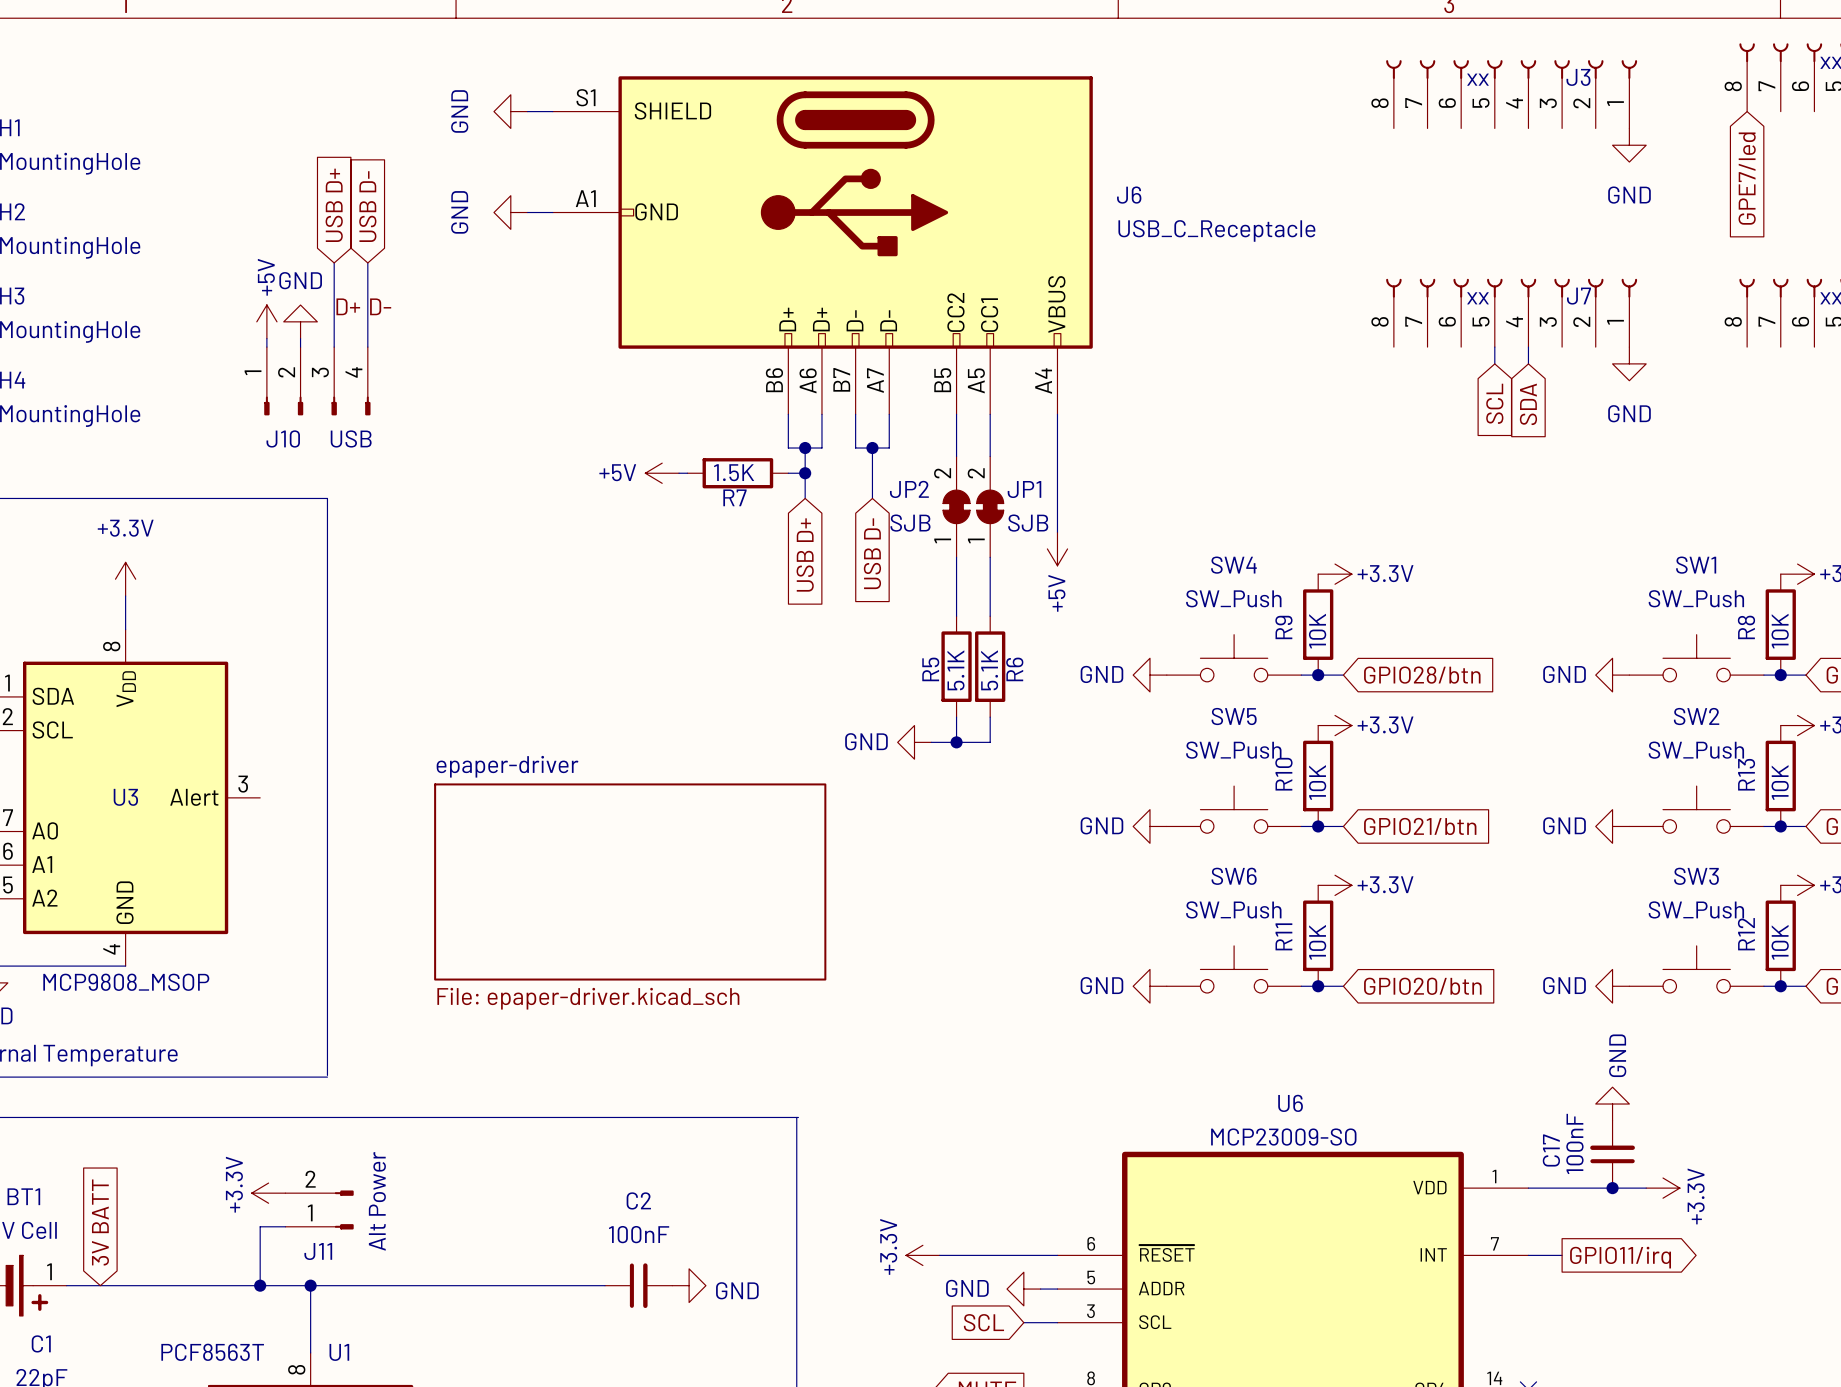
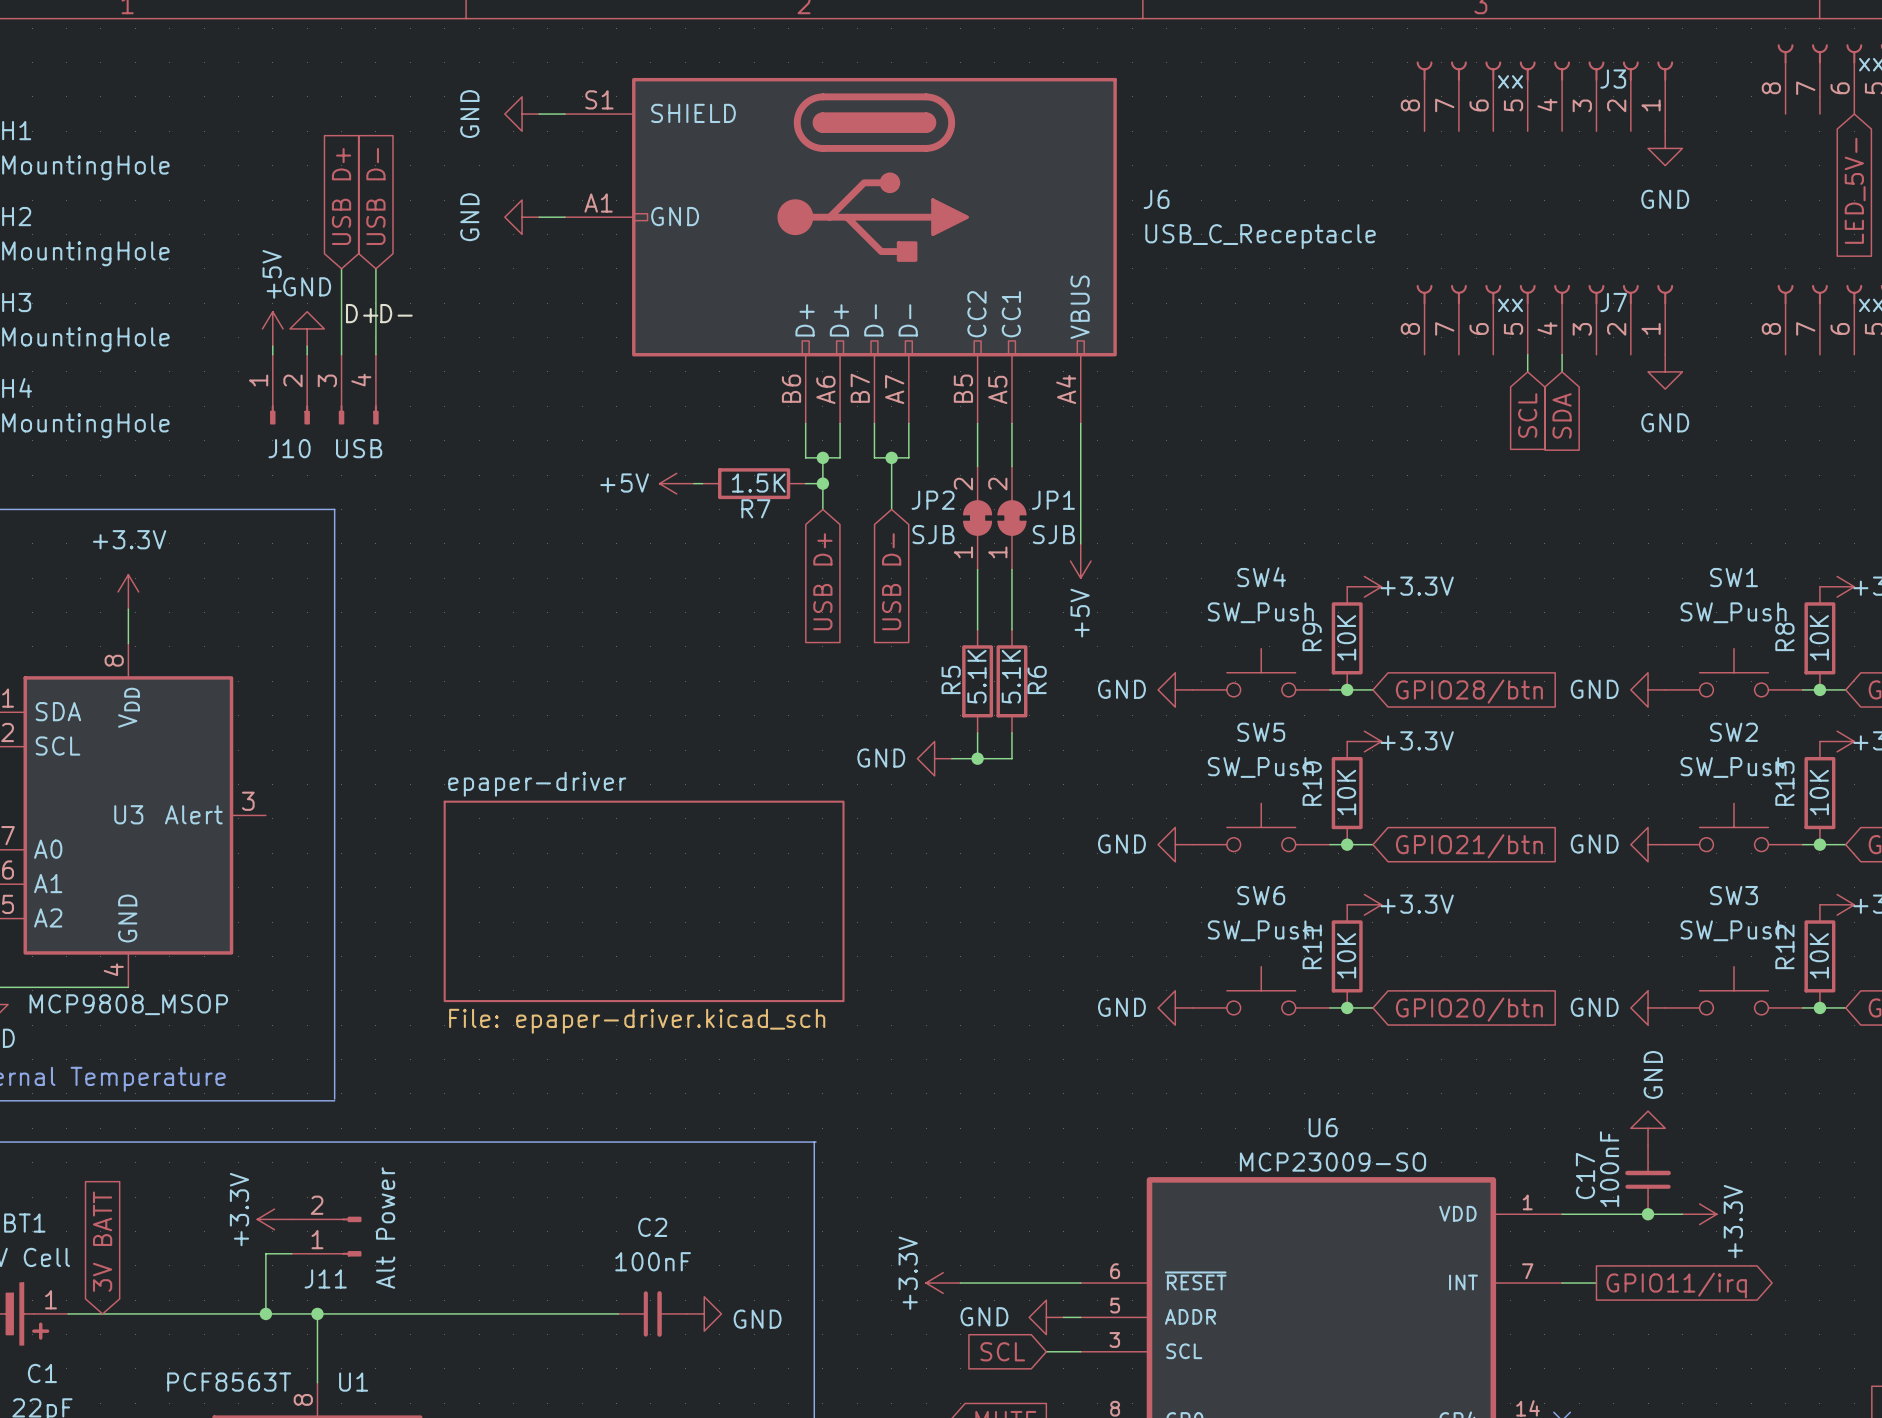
global label: none -> LED_5V- (1855, 190)
global label: GPE7/led (1747, 178) -> none

